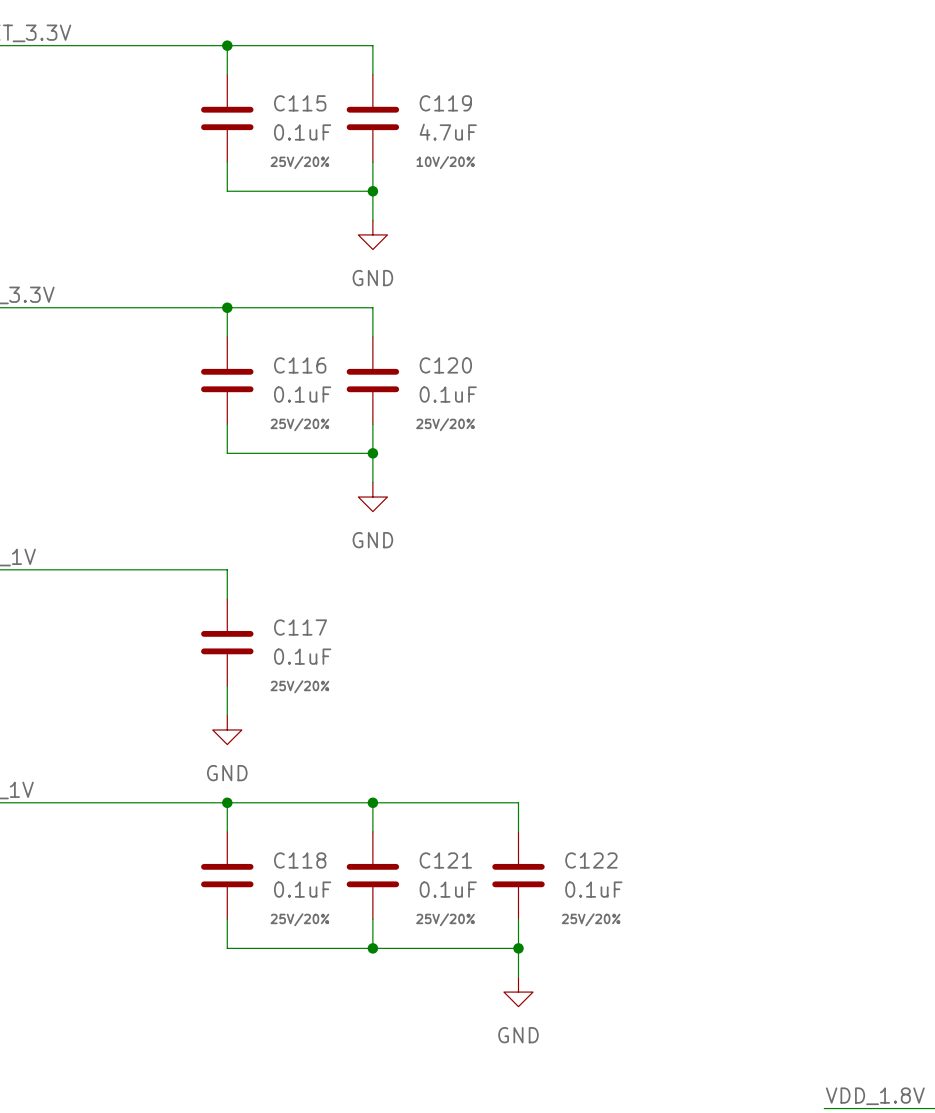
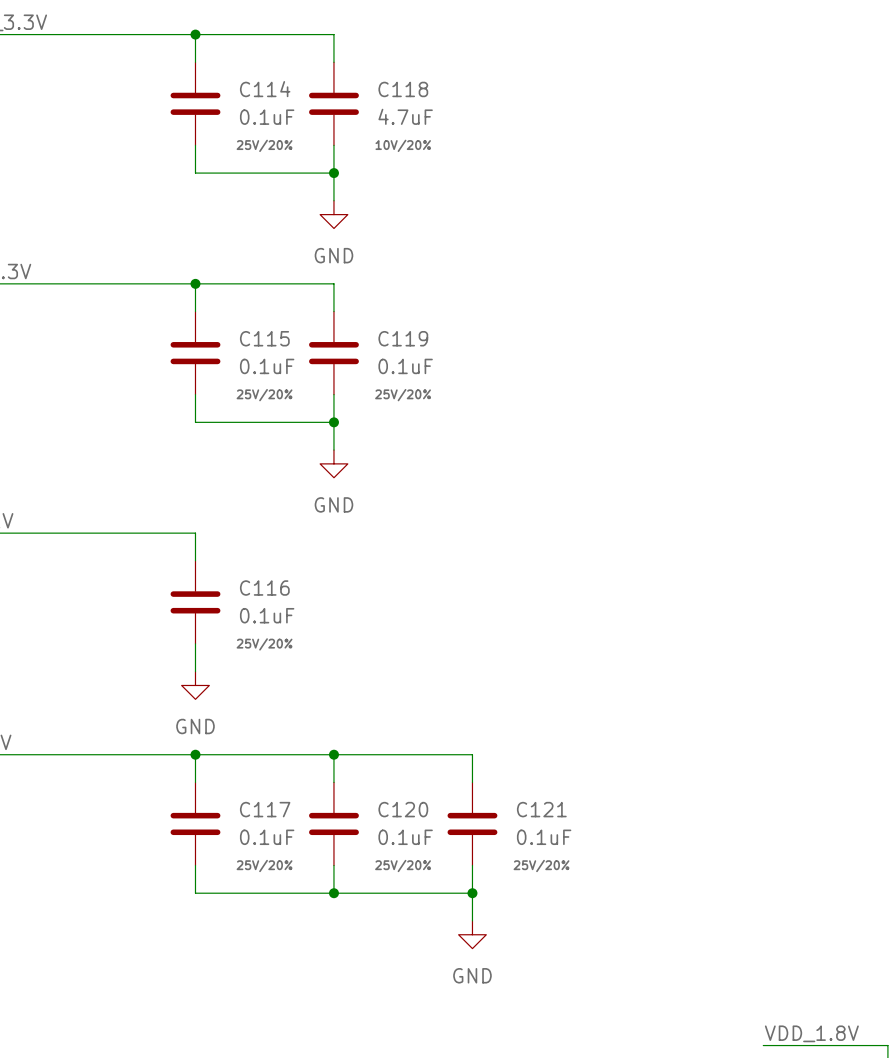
C115 name: C115 (300, 103) -> C114 (265, 89)
C119 name: C119 (445, 103) -> C118 (403, 89)
C116 name: C116 (300, 365) -> C115 (264, 338)
C120 name: C120 (445, 365) -> C119 (403, 338)
C117 name: C117 (300, 627) -> C116 (264, 588)
C118 name: C118 (300, 860) -> C117 (265, 809)
C121 name: C121 (445, 860) -> C120 (403, 809)
C122 name: C122 (591, 860) -> C121 (541, 809)

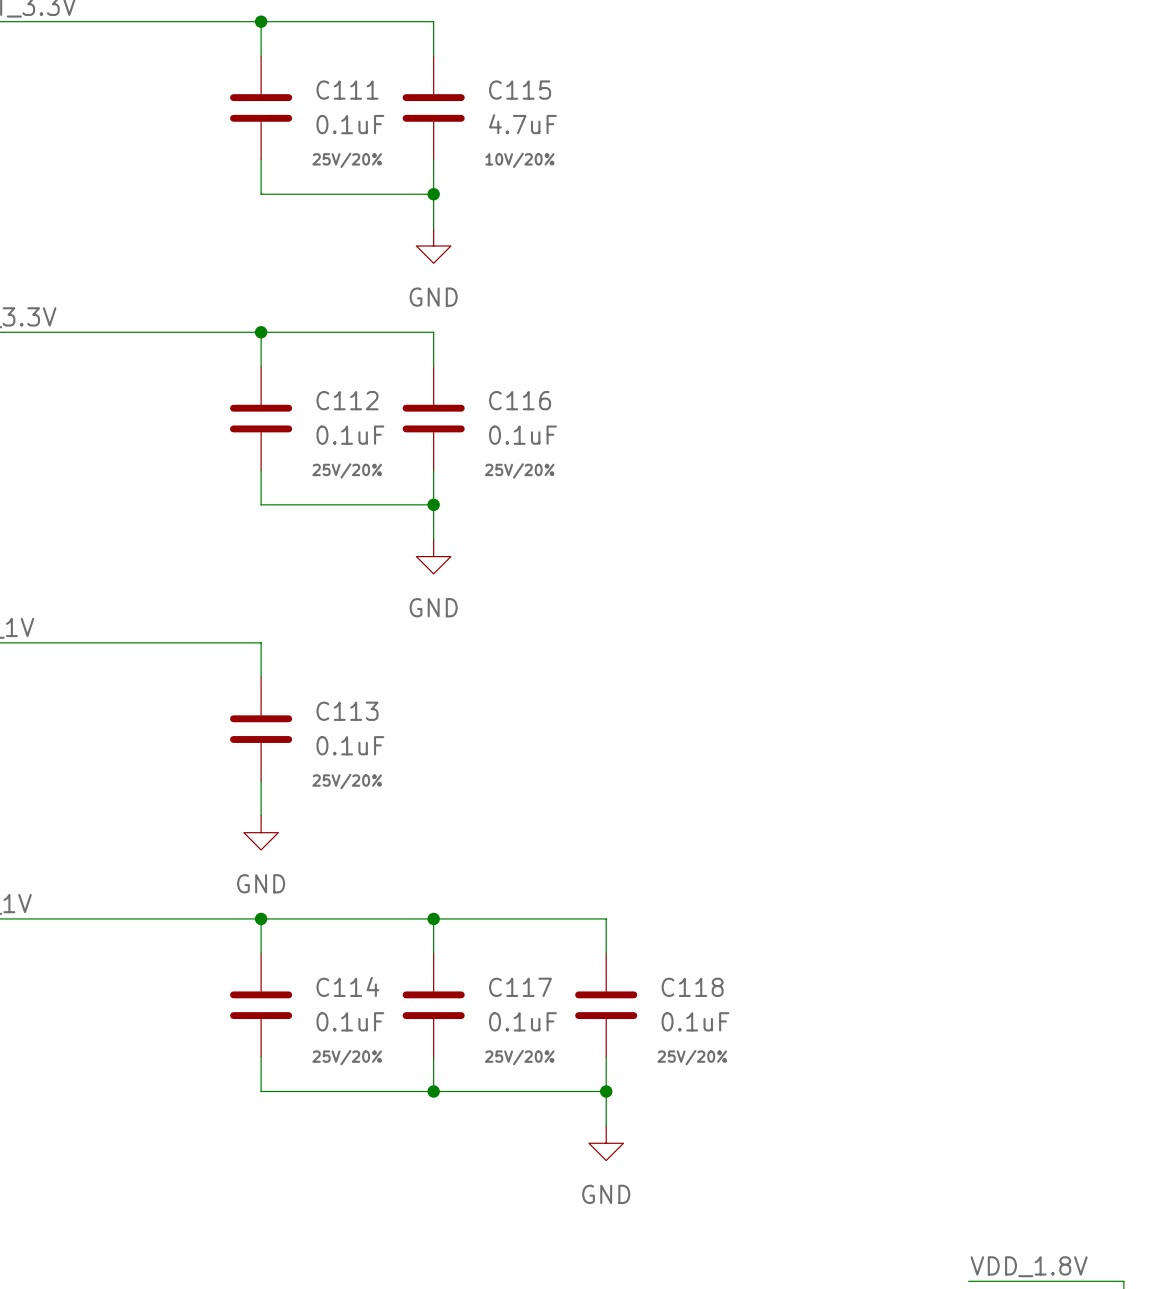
C114 name: C114 (265, 89) -> C111 (347, 90)
C118 name: C118 (403, 89) -> C115 (520, 90)
C115 name: C115 (264, 338) -> C112 (347, 400)
C119 name: C119 (403, 338) -> C116 (520, 400)
C116 name: C116 (264, 588) -> C113 (347, 711)
C117 name: C117 (265, 809) -> C114 (347, 986)
C120 name: C120 (403, 809) -> C117 (520, 987)
C121 name: C121 (541, 809) -> C118 (692, 987)

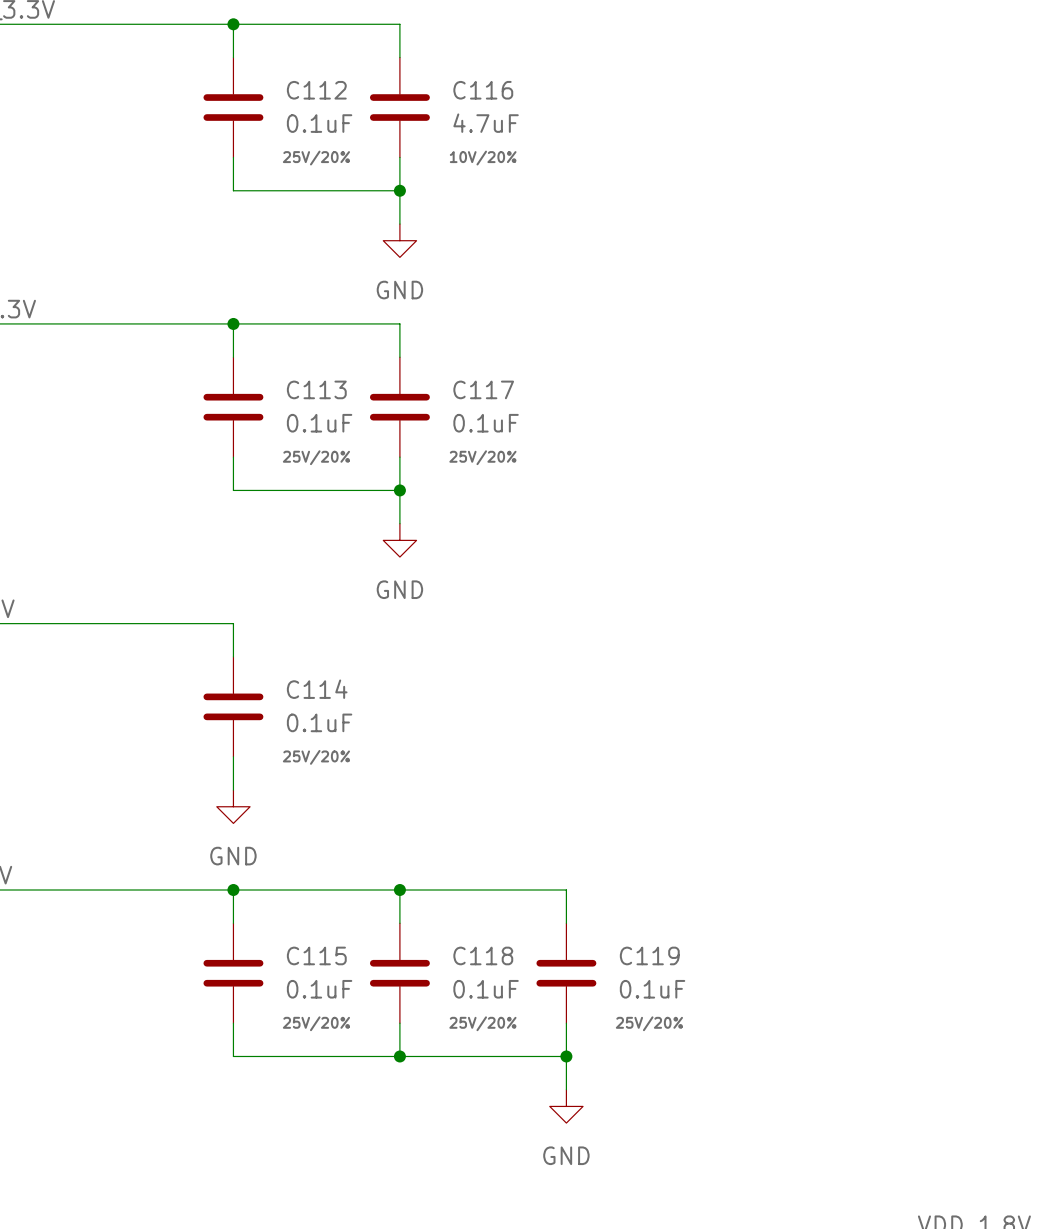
C111 name: C111 (347, 90) -> C112 (316, 90)
C115 name: C115 (520, 90) -> C116 (483, 90)
C112 name: C112 (347, 400) -> C113 (316, 389)
C116 name: C116 (520, 400) -> C117 (483, 389)
C113 name: C113 (347, 711) -> C114 (317, 689)
C114 name: C114 (347, 986) -> C115 (316, 955)
C117 name: C117 (520, 987) -> C118 (483, 955)
C118 name: C118 (692, 987) -> C119 (649, 955)

